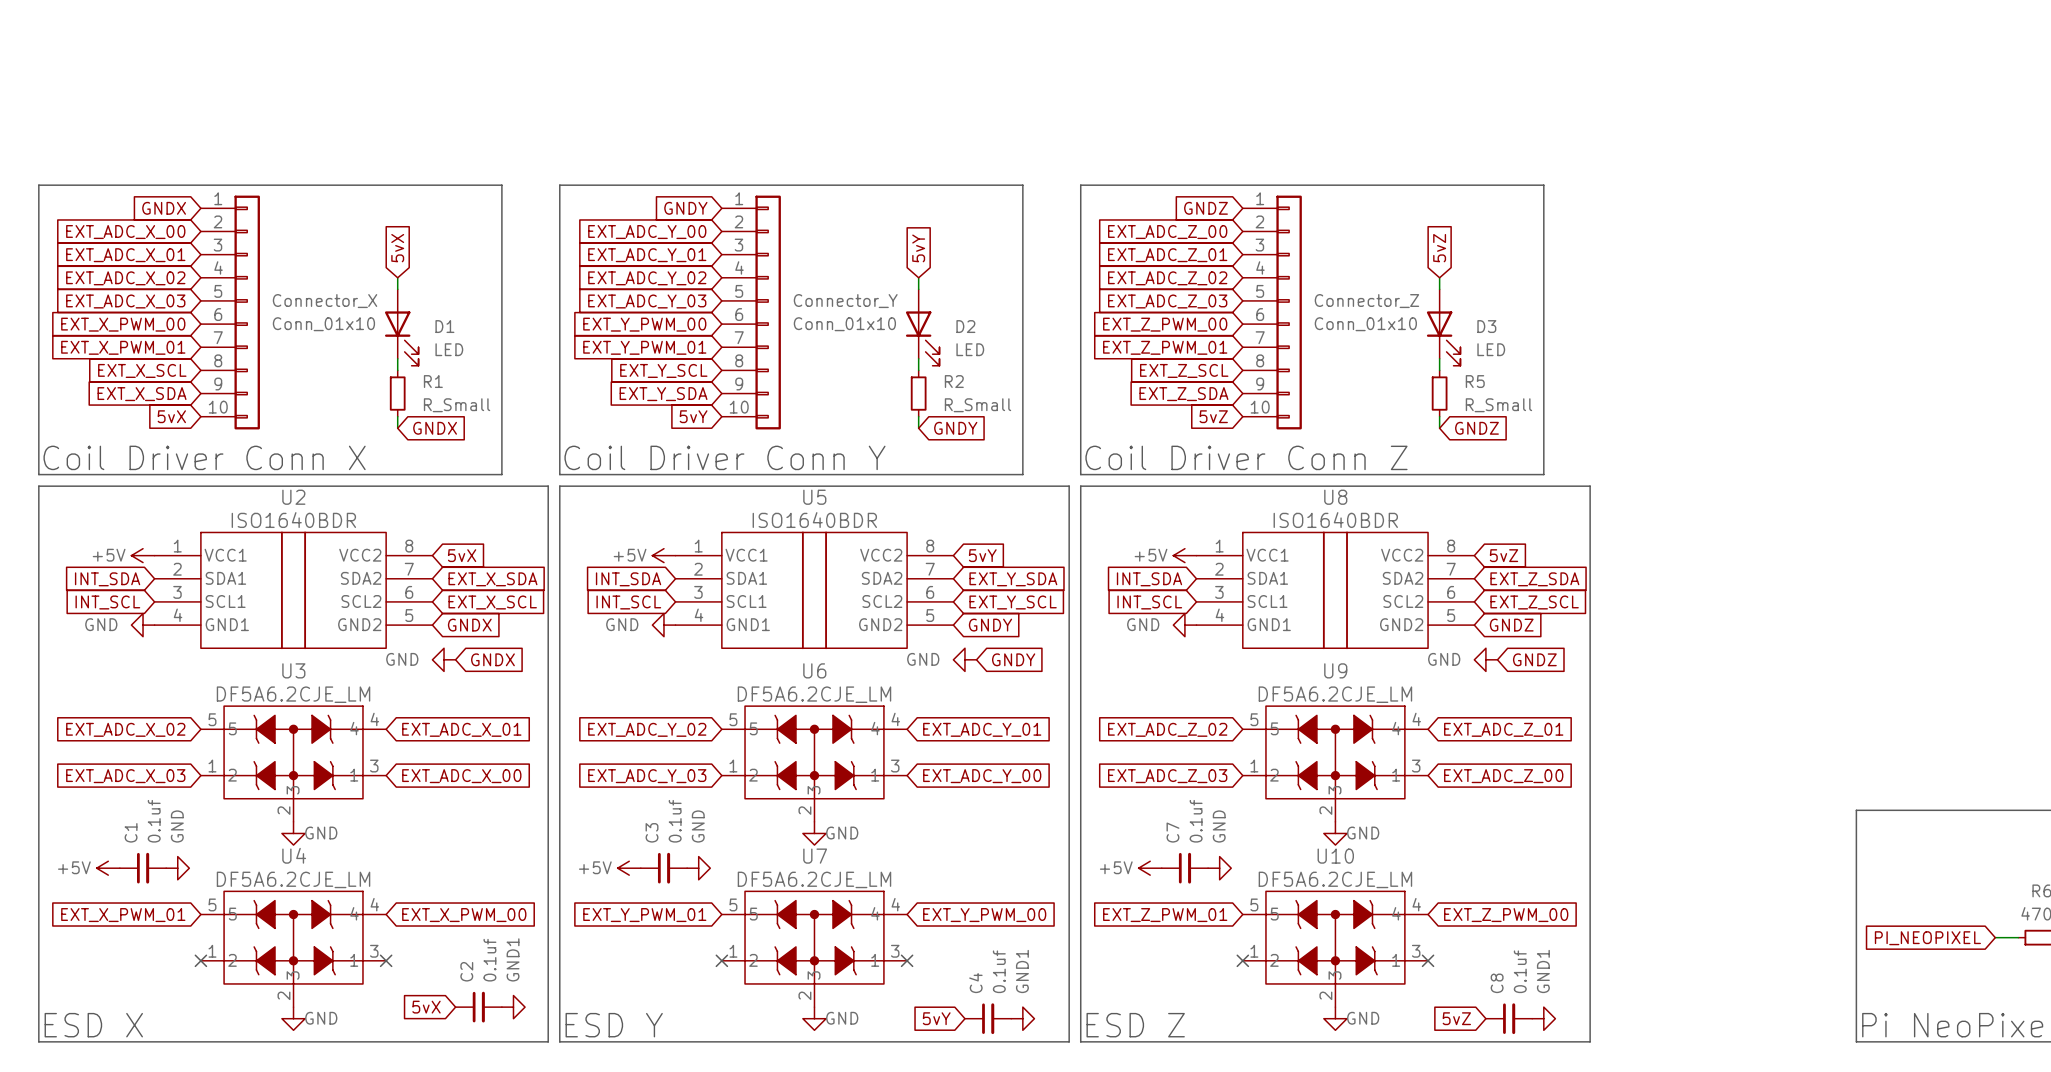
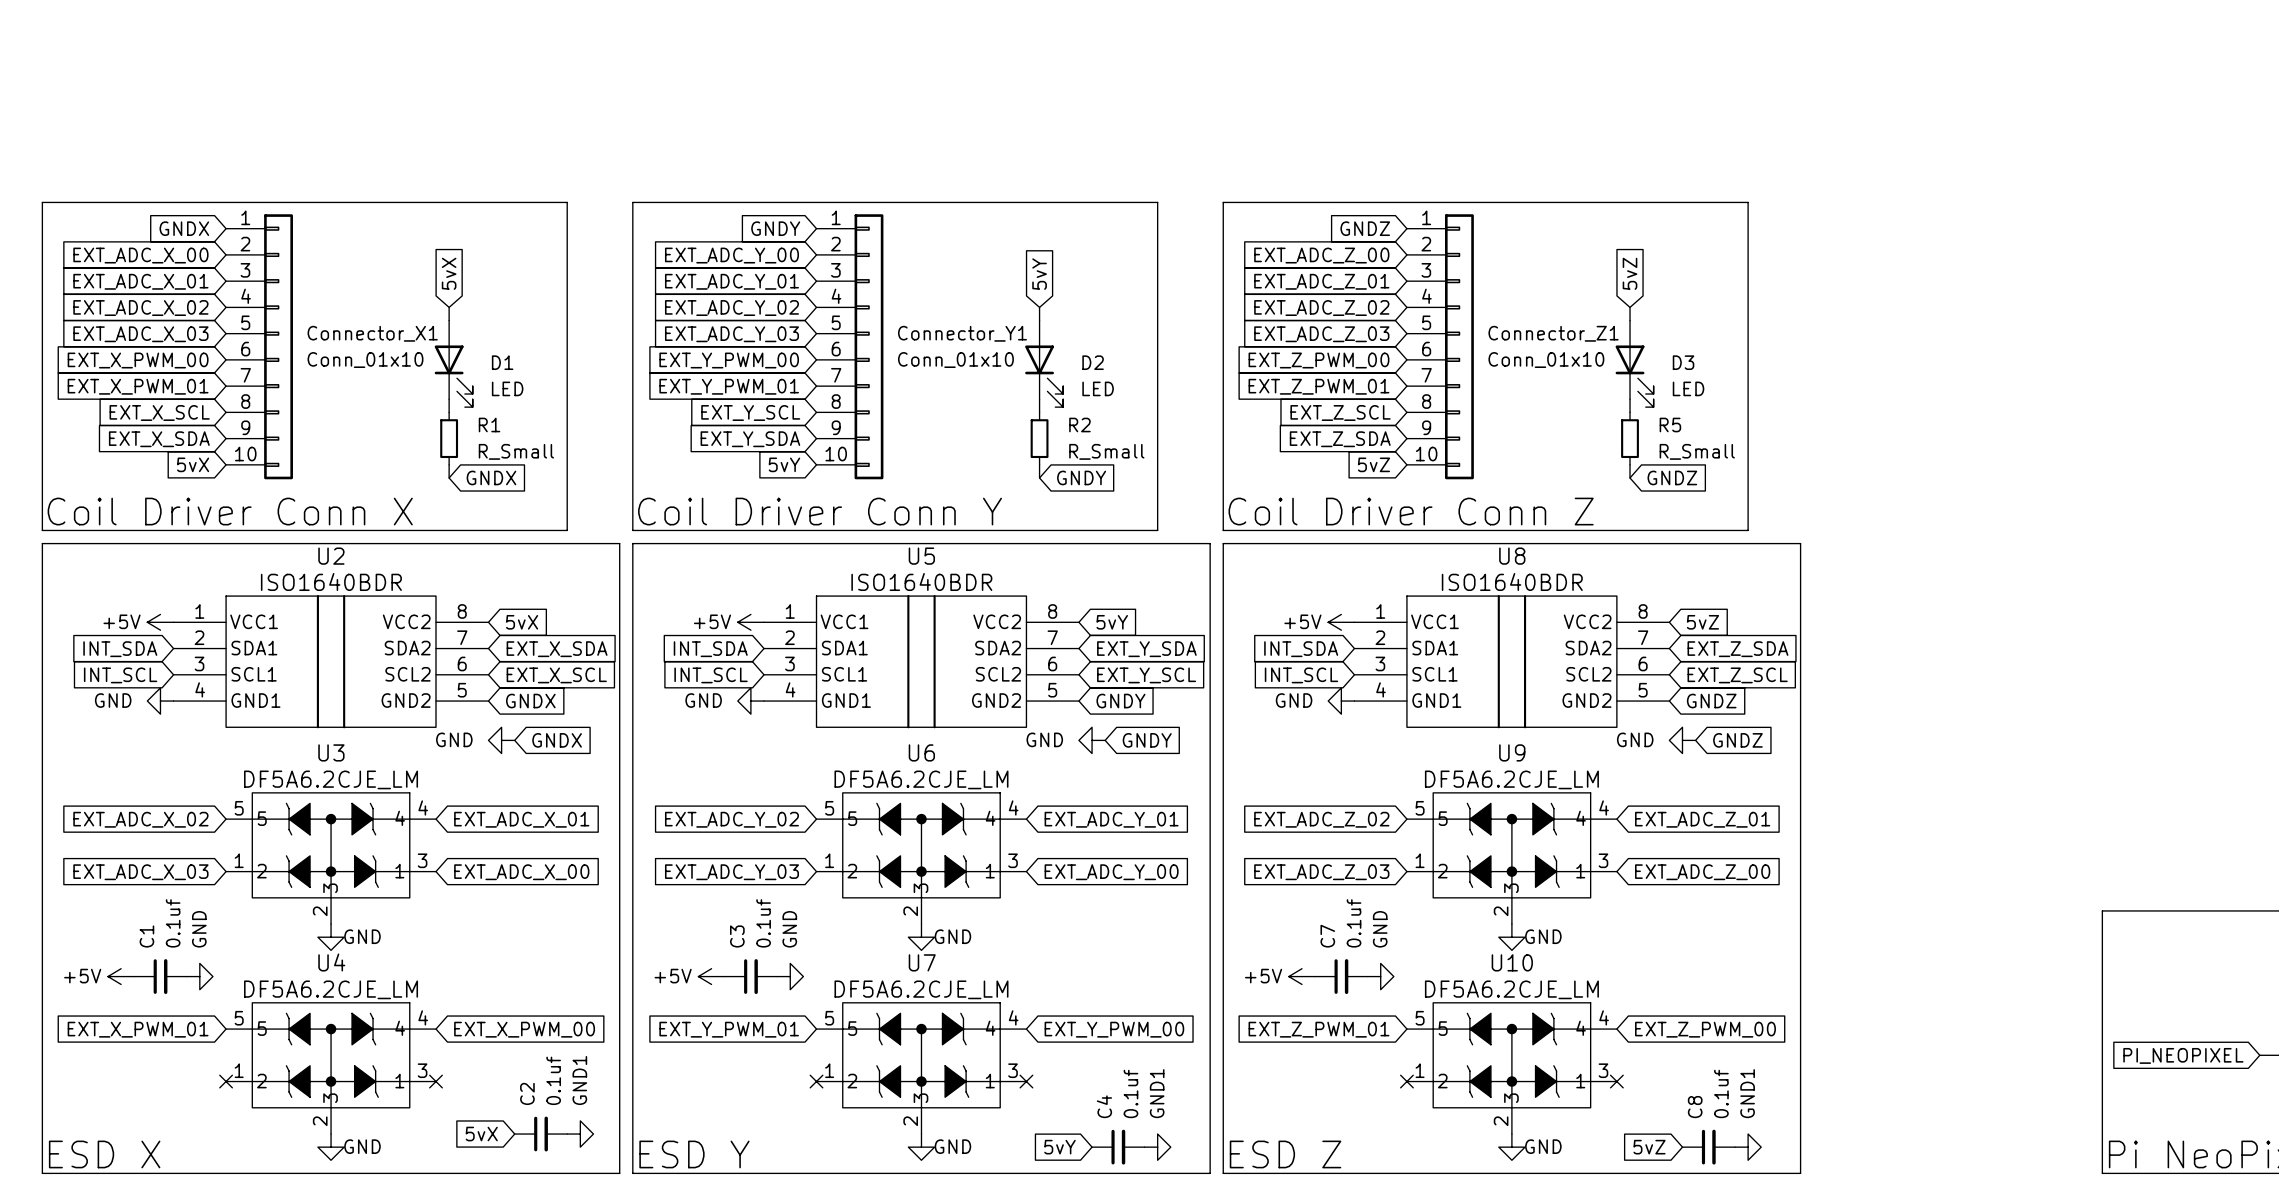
Connector_X name: Connector_X (325, 301) -> Connector_X1 (372, 333)
Connector_Y name: Connector_Y (845, 301) -> Connector_Y1 (962, 333)
Connector_Z name: Connector_Z (1366, 301) -> Connector_Z1 (1553, 333)

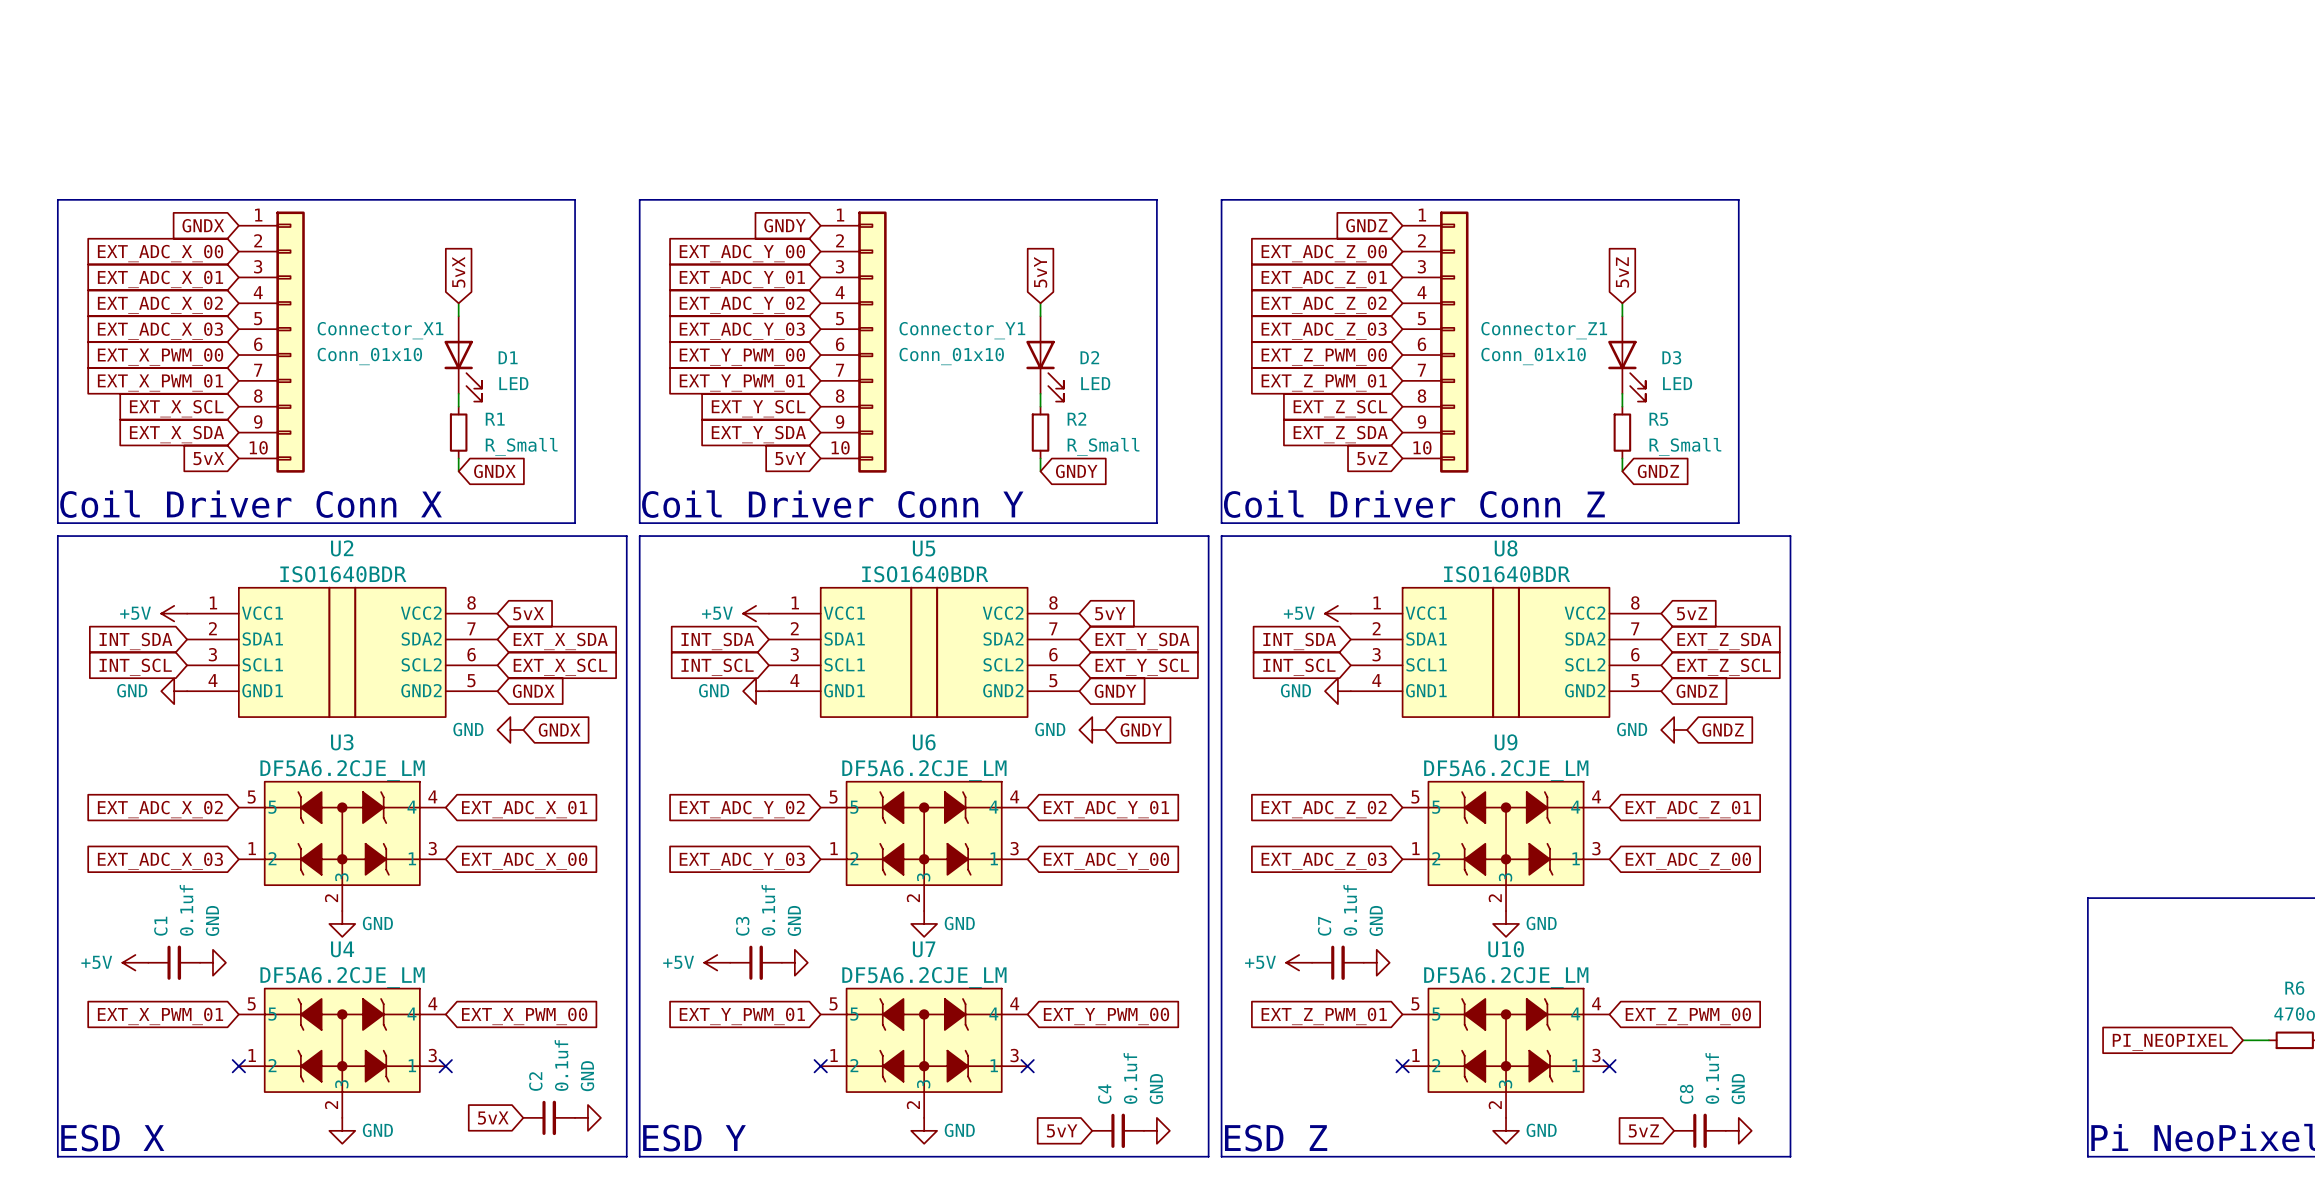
power symbol: GND1 (580, 1134) -> GND (587, 1117)
power symbol: GND1 (1157, 1147) -> GND (1156, 1130)
power symbol: GND1 (1748, 1147) -> GND (1738, 1130)

